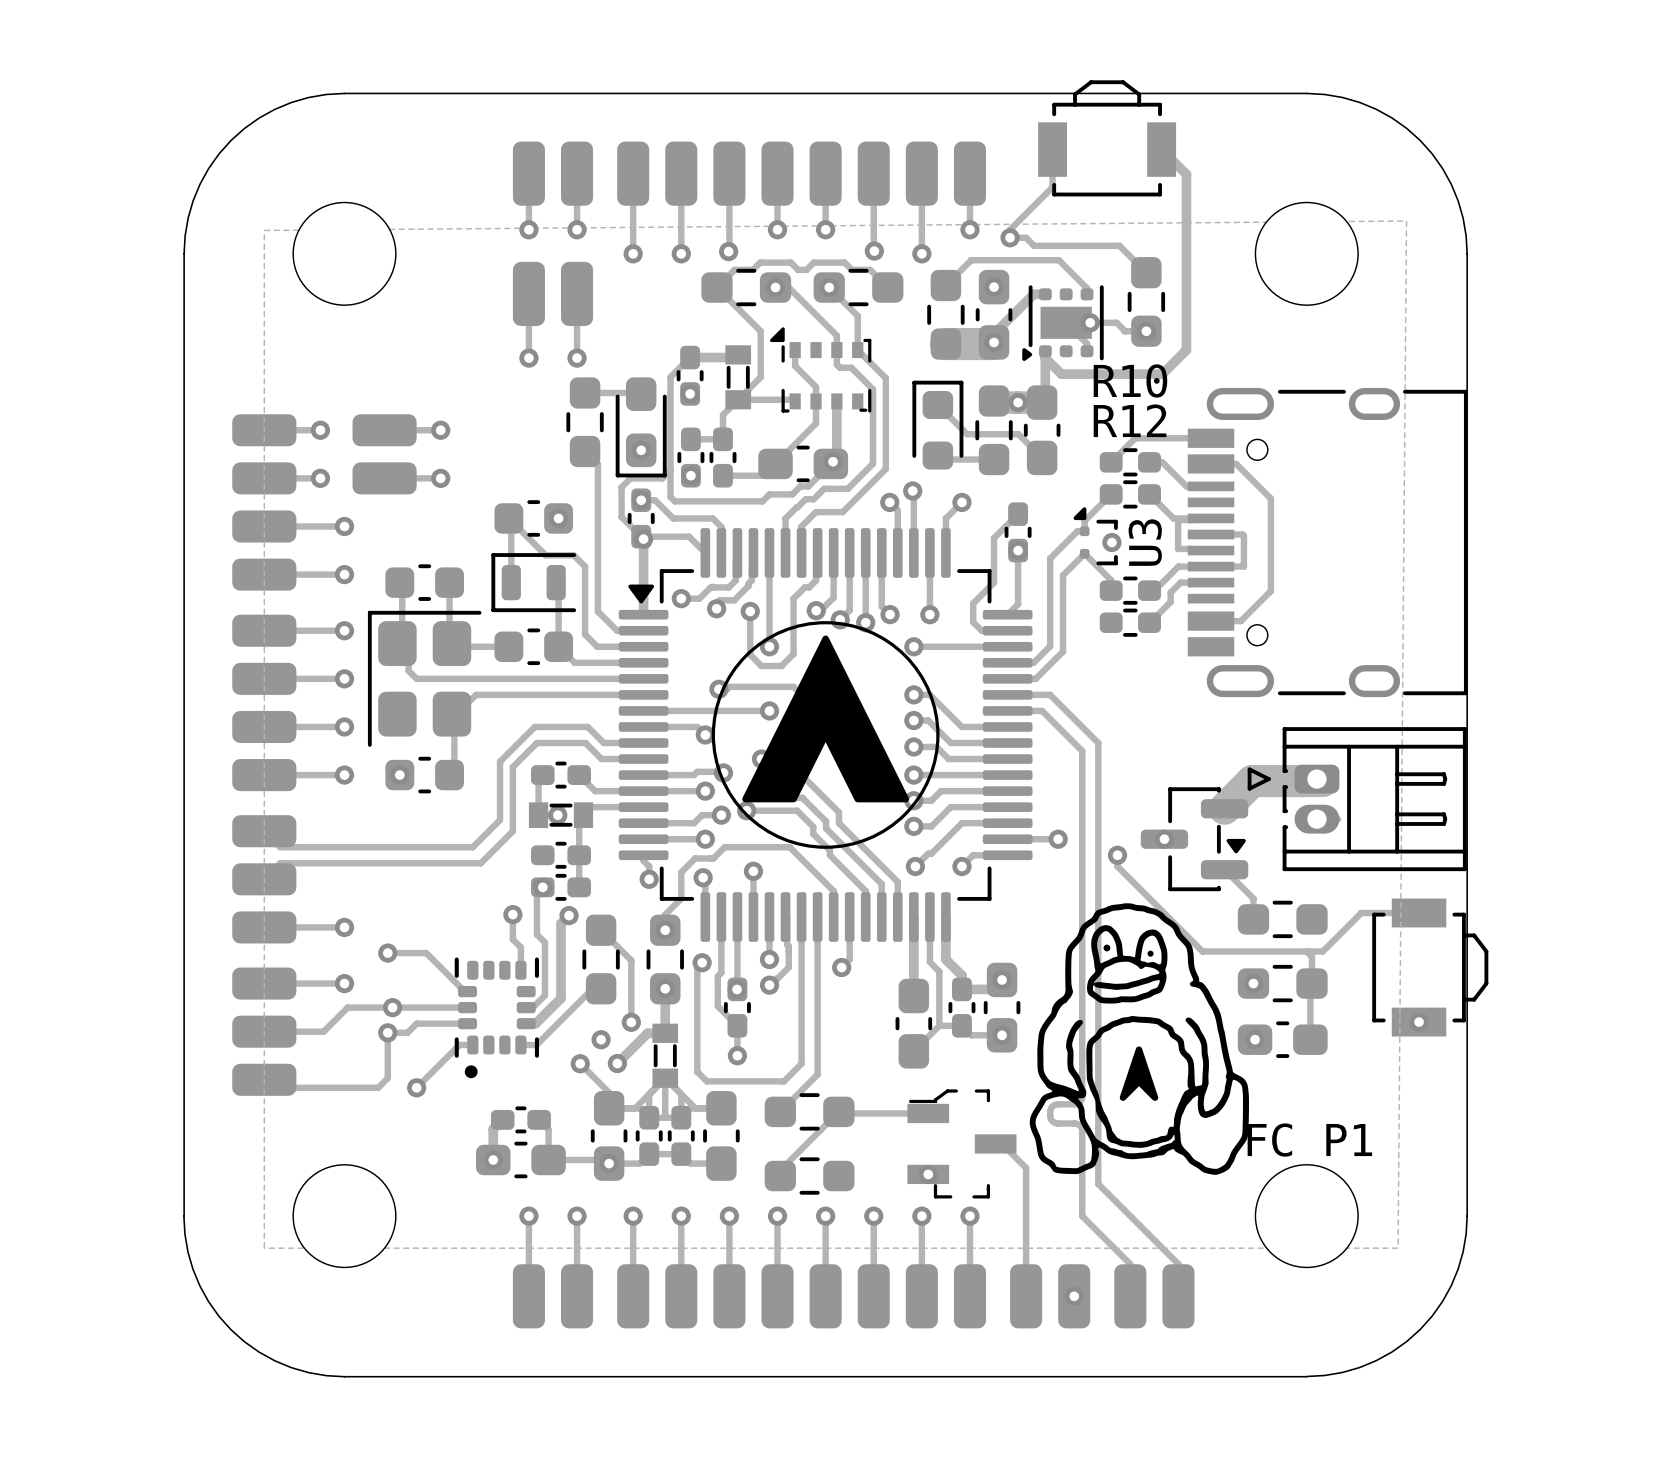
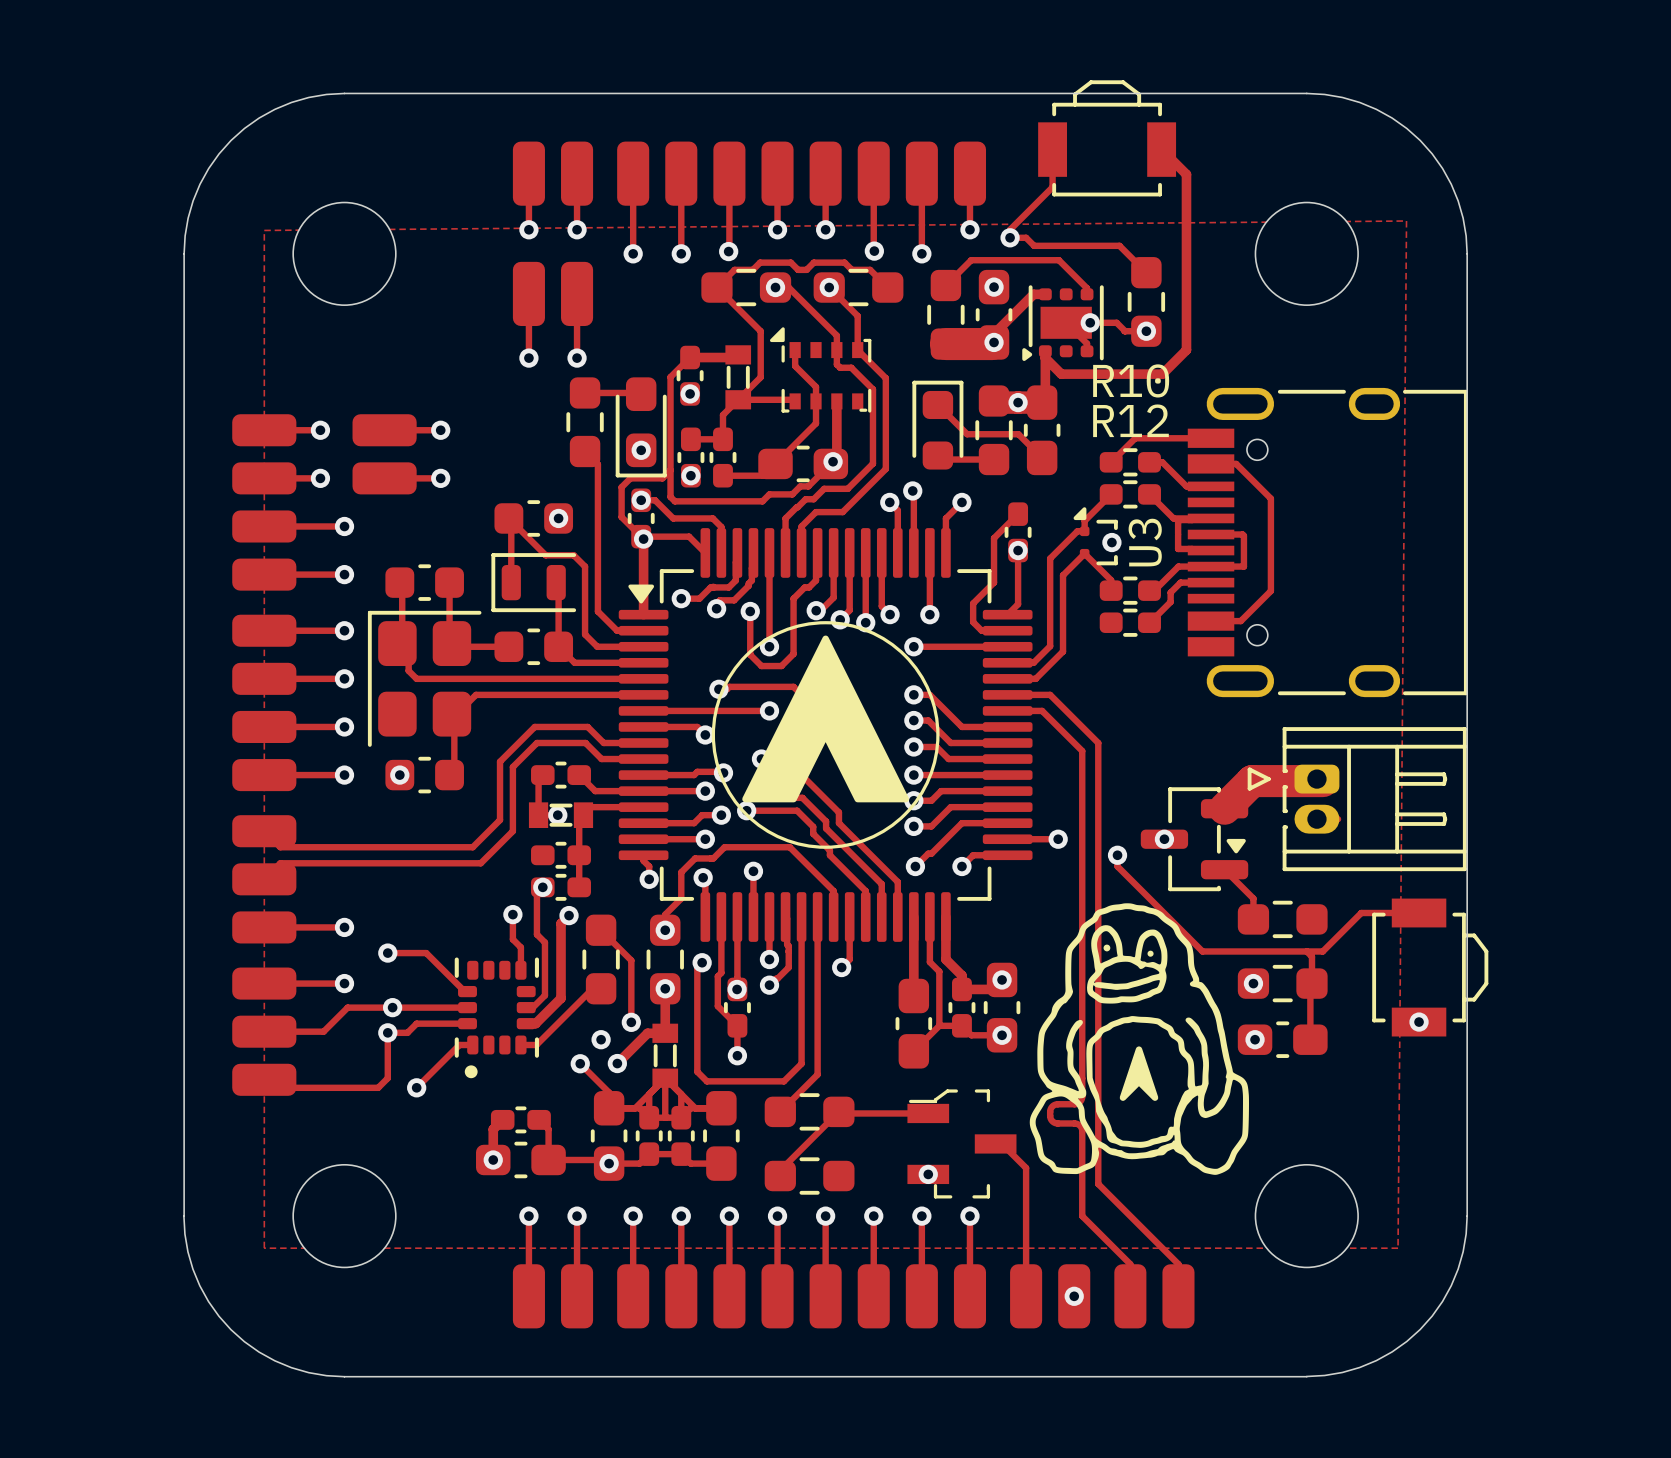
text: FC P1 (1309, 1140) -> none

